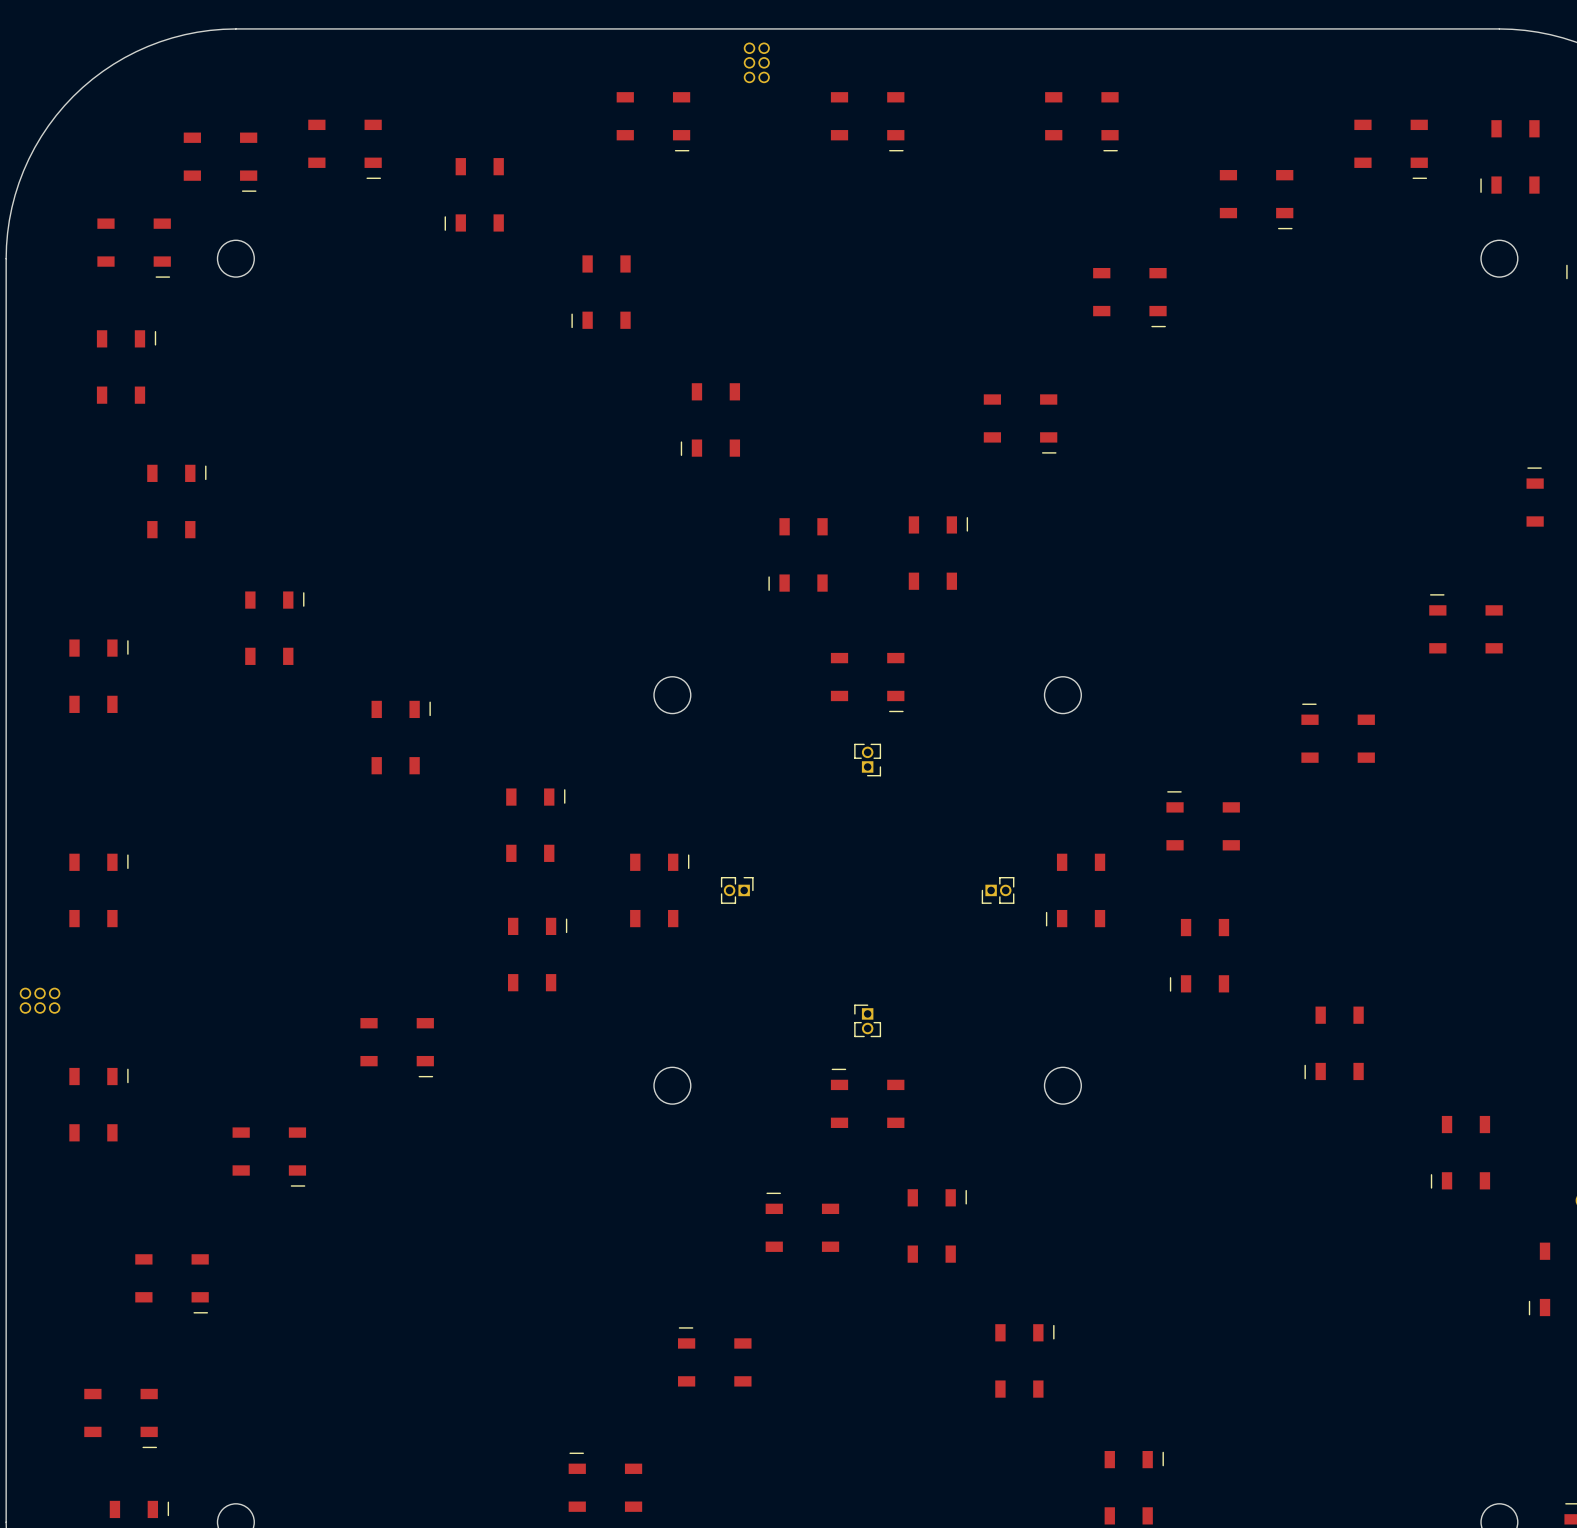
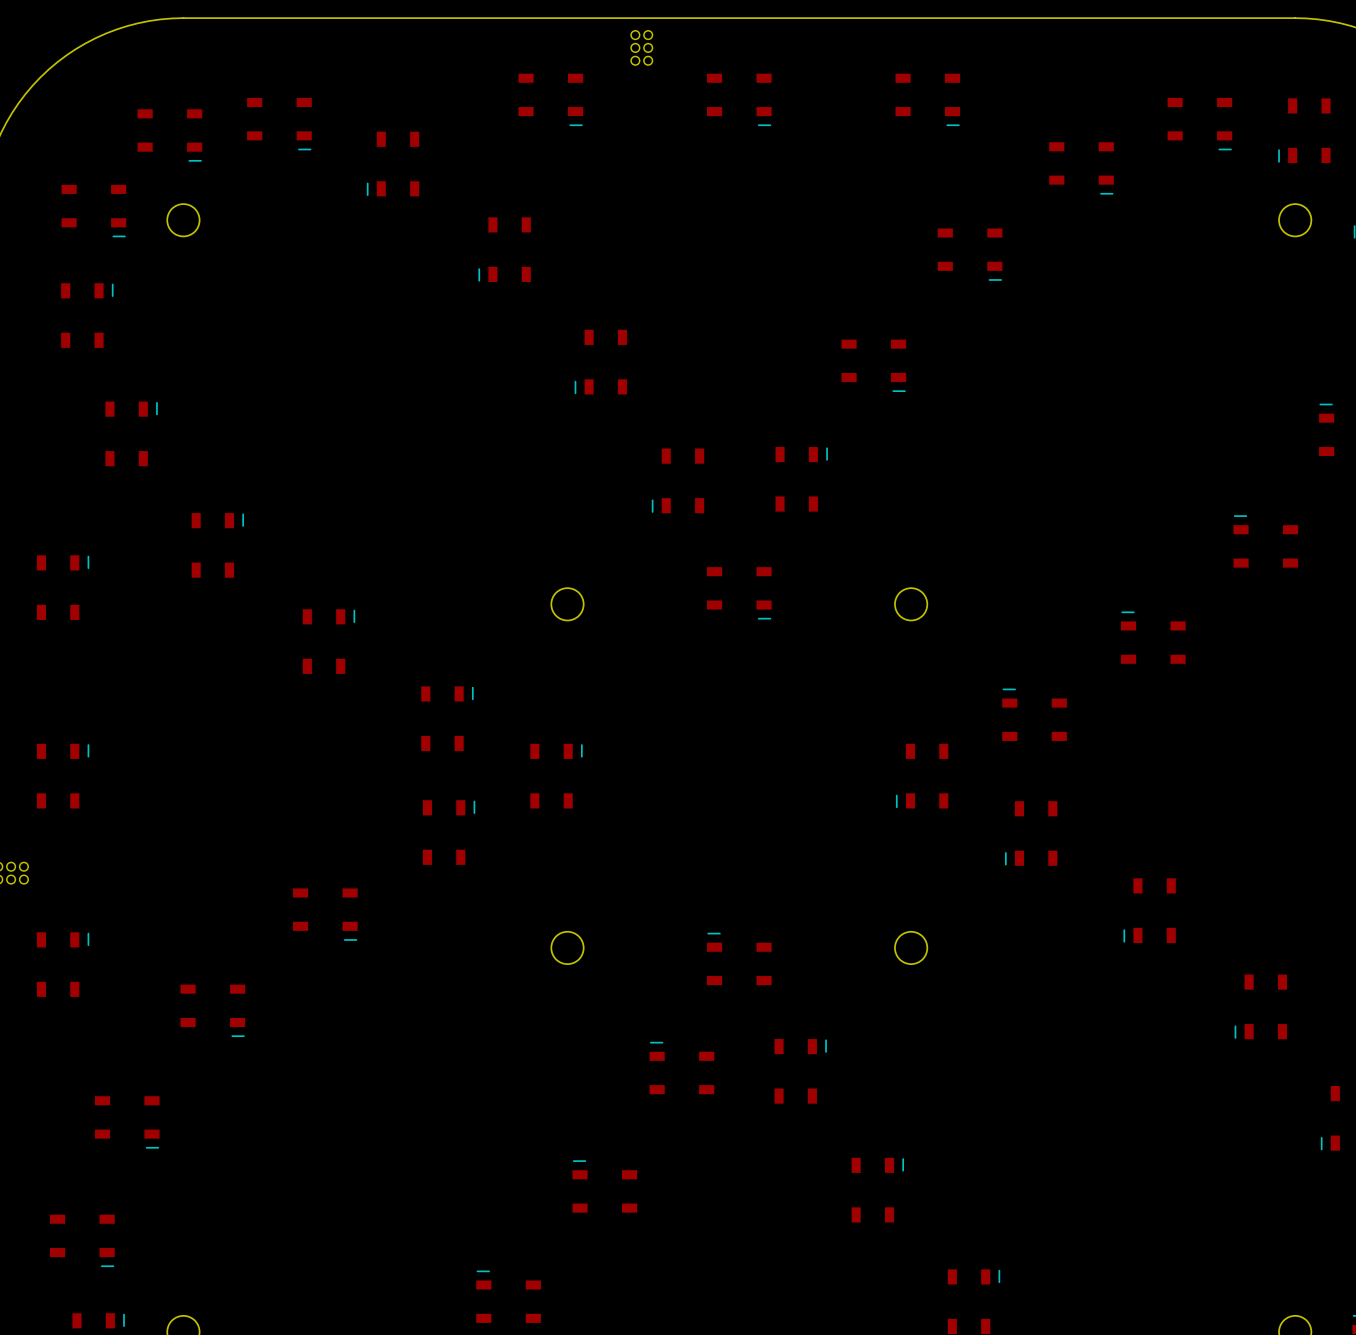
part: (867, 760) -> none
part: (737, 890) -> none
part: (998, 890) -> none
part: (867, 1020) -> none

